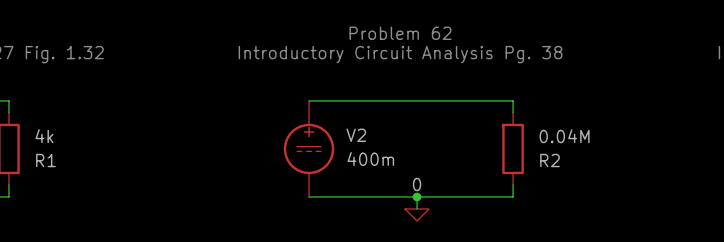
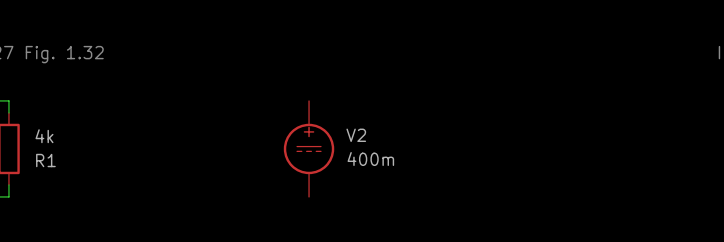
text: Problem 62 (400, 33) -> none
text: Introductory Circuit Analysis Pg. 38 (400, 54) -> none
wire: (309, 100) (513, 100) (513, 112) -> none
R2: 0.04M (513, 148) -> none
wire: (513, 184) (513, 196) (309, 196) -> none
wire: (417, 196) (417, 208) -> none
junction: (417, 196) -> none
power symbol: 0 (417, 214) -> none

